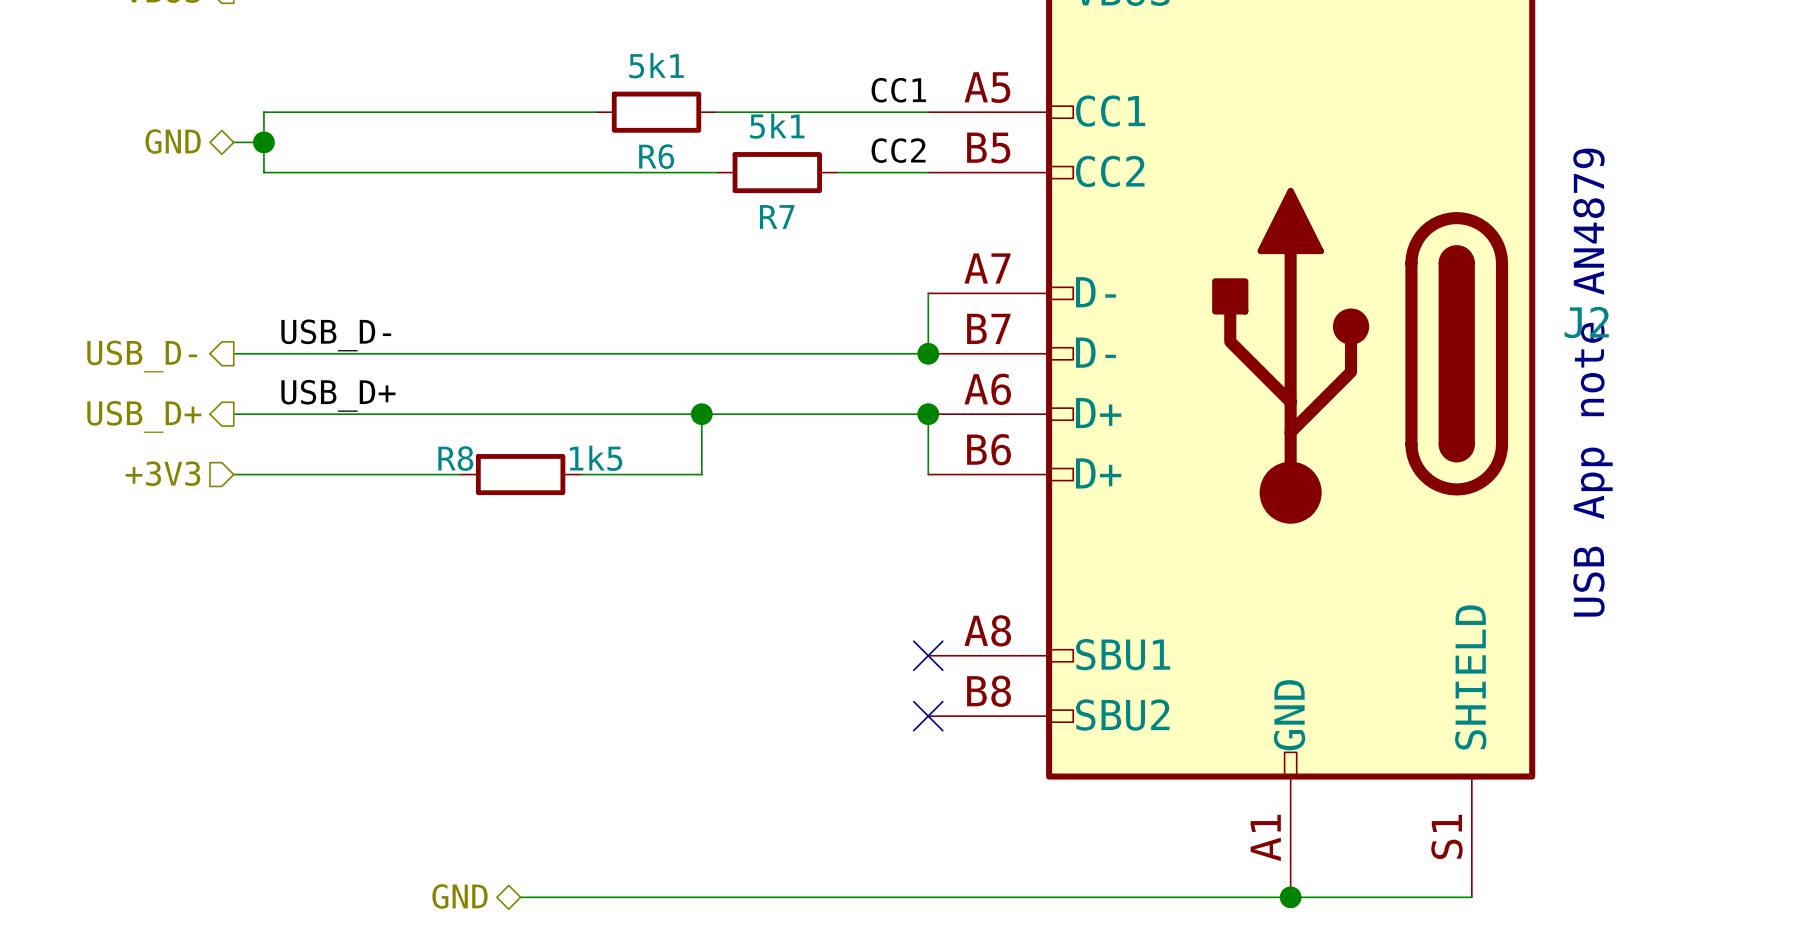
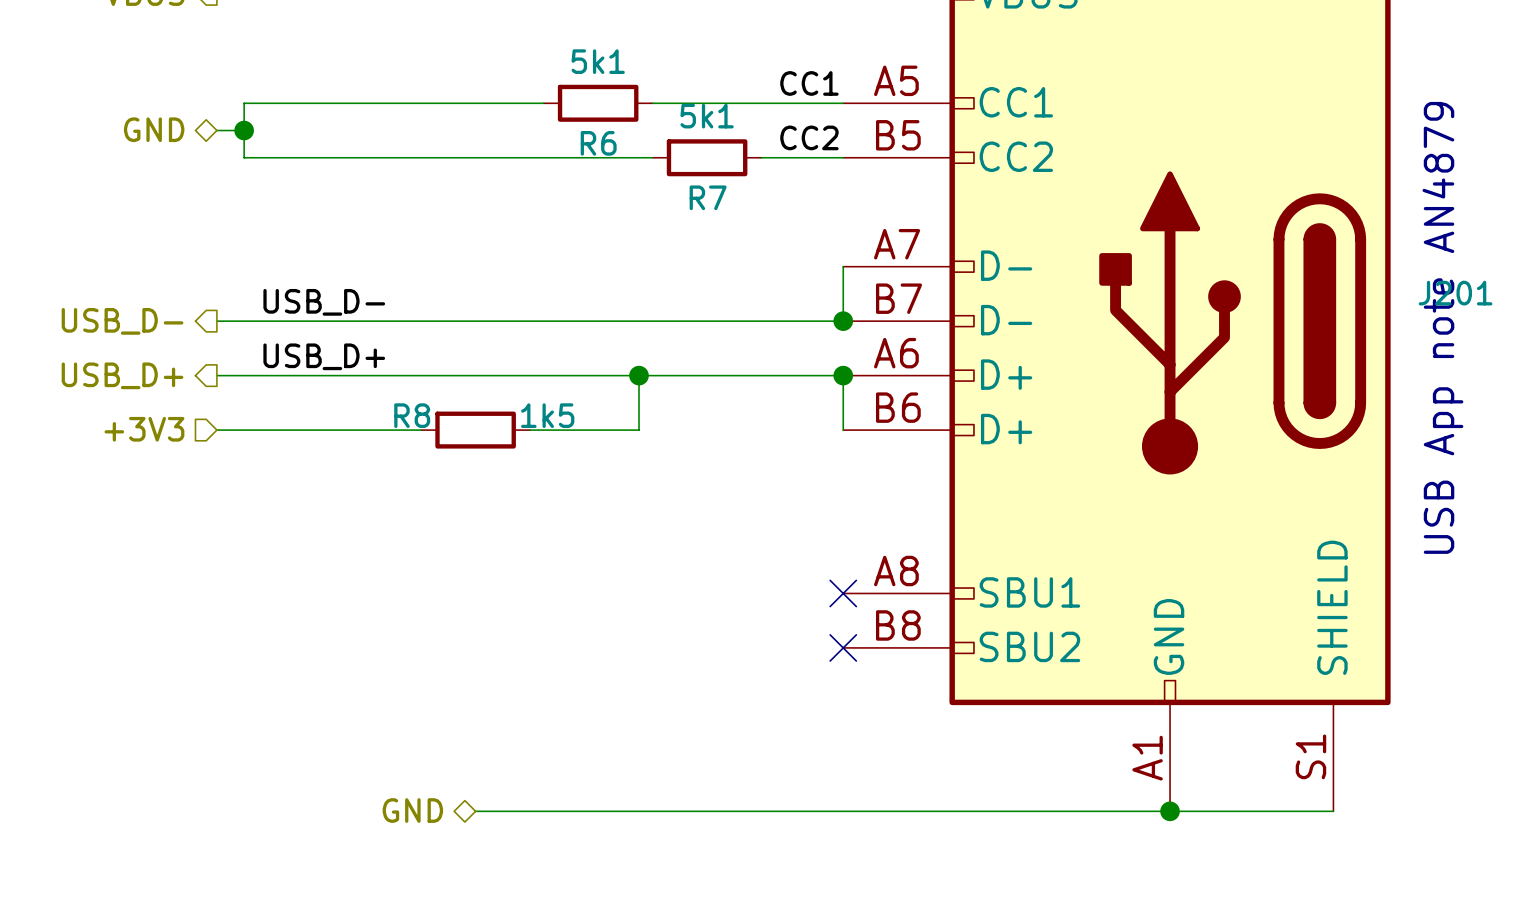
J2 name: J2 (1586, 322) -> J201 (1455, 293)

